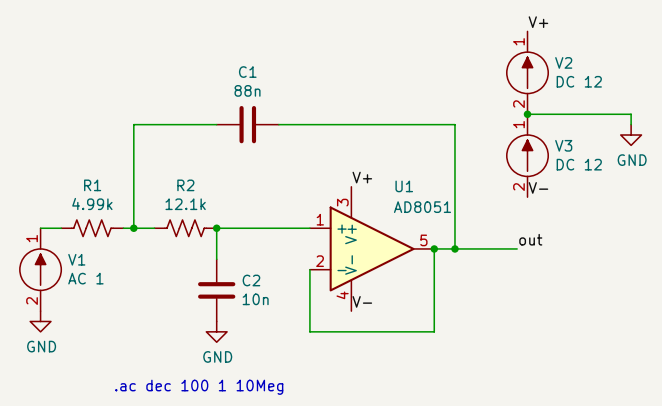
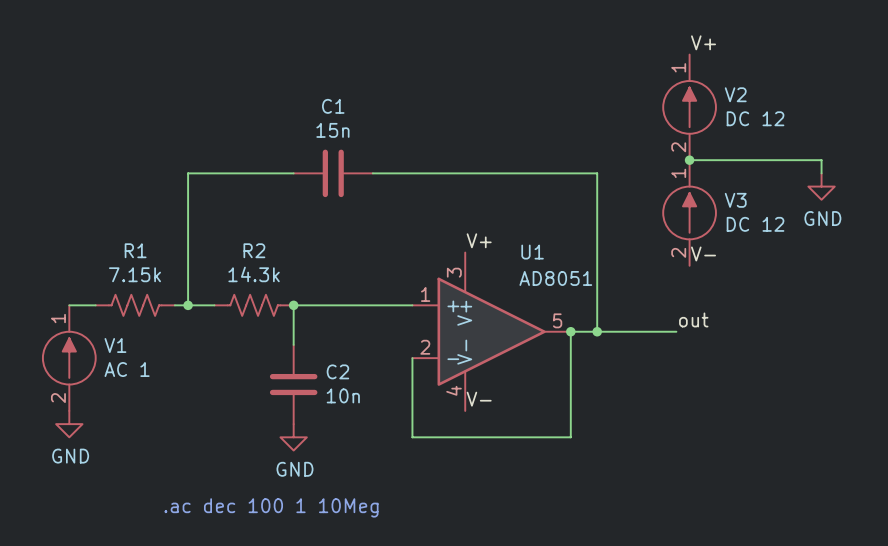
C1 value: 88n (247, 90) -> 15n (332, 130)
R1 value: 4.99k (92, 203) -> 7.15k (134, 274)
R2 value: 12.1k (185, 204) -> 14.3k (254, 274)

